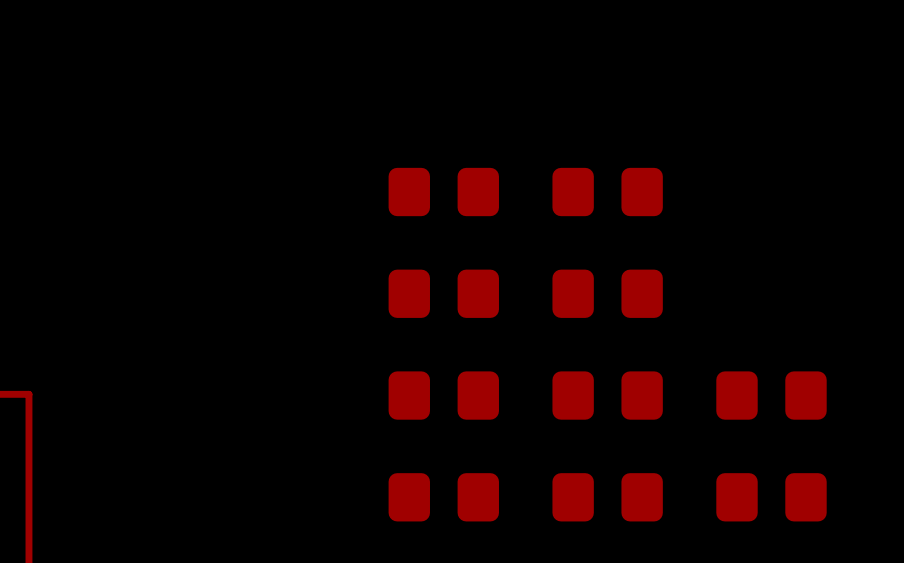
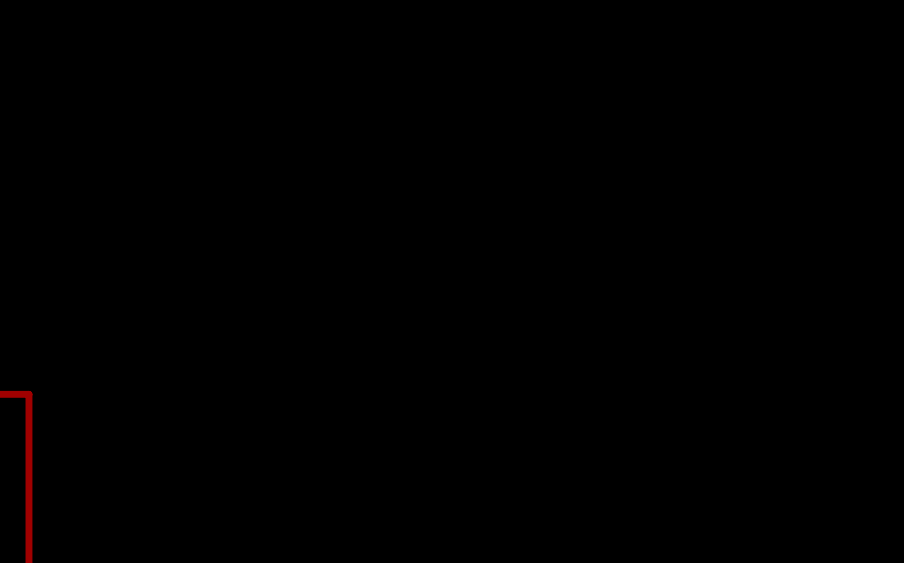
part: (443, 192) -> none
part: (607, 192) -> none
part: (443, 293) -> none
part: (607, 293) -> none
part: (443, 395) -> none
part: (607, 395) -> none
part: (771, 395) -> none
part: (443, 497) -> none
part: (607, 497) -> none
part: (771, 497) -> none

